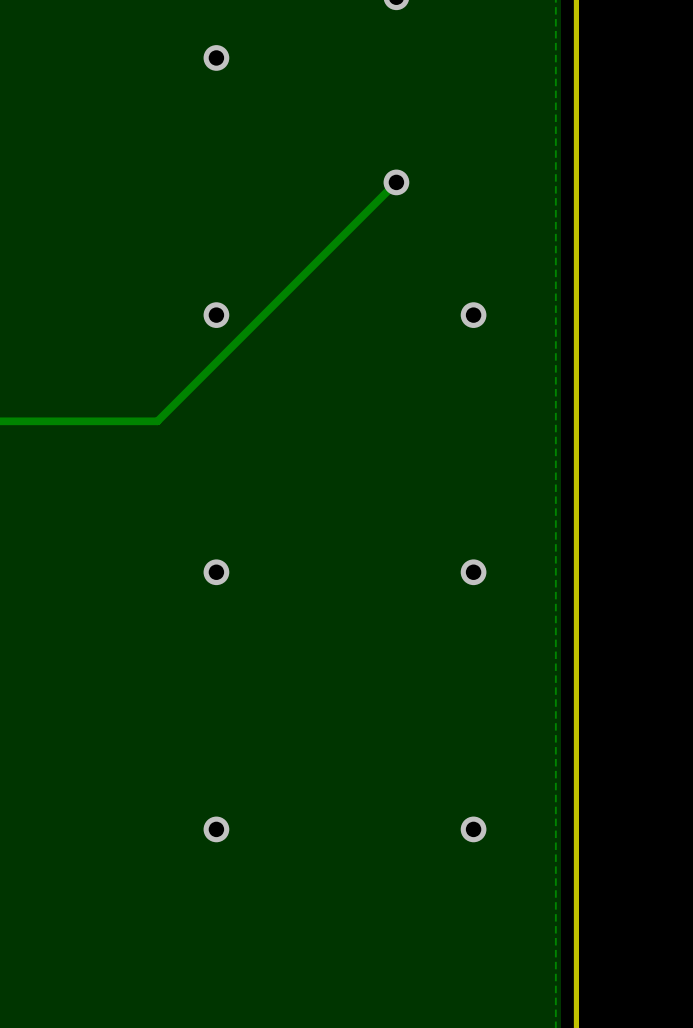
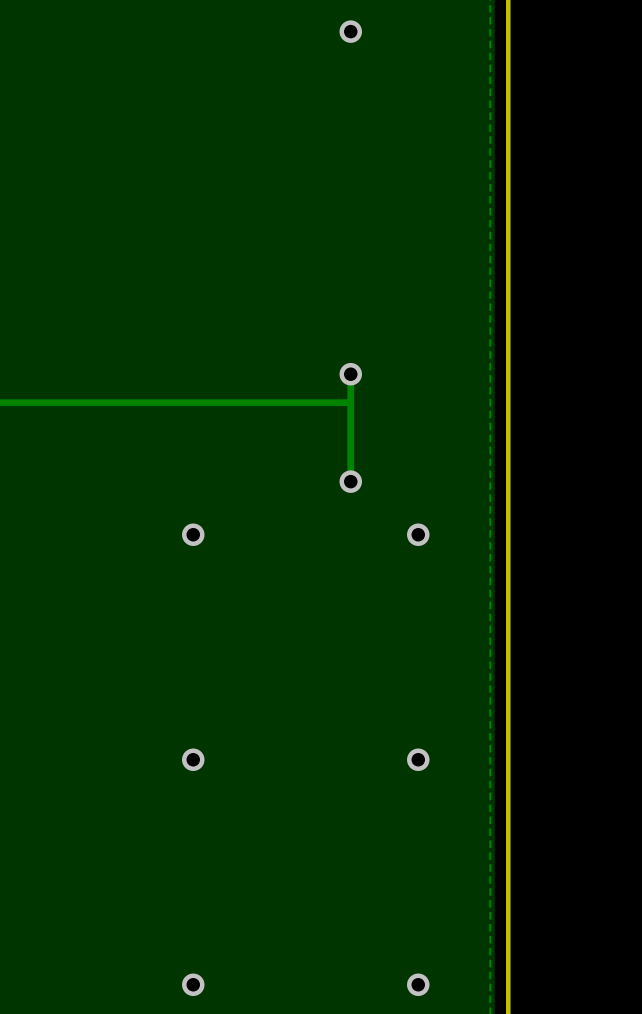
via: (216, 57) -> none
track: (396, 182) (157, 421) -> (350, 402) (141, 402)
via: (396, 182) -> none
via: (216, 315) -> none
via: (473, 315) -> none
track: none -> (350, 374) (350, 481)
via: none -> (350, 374)
via: none -> (350, 481)

